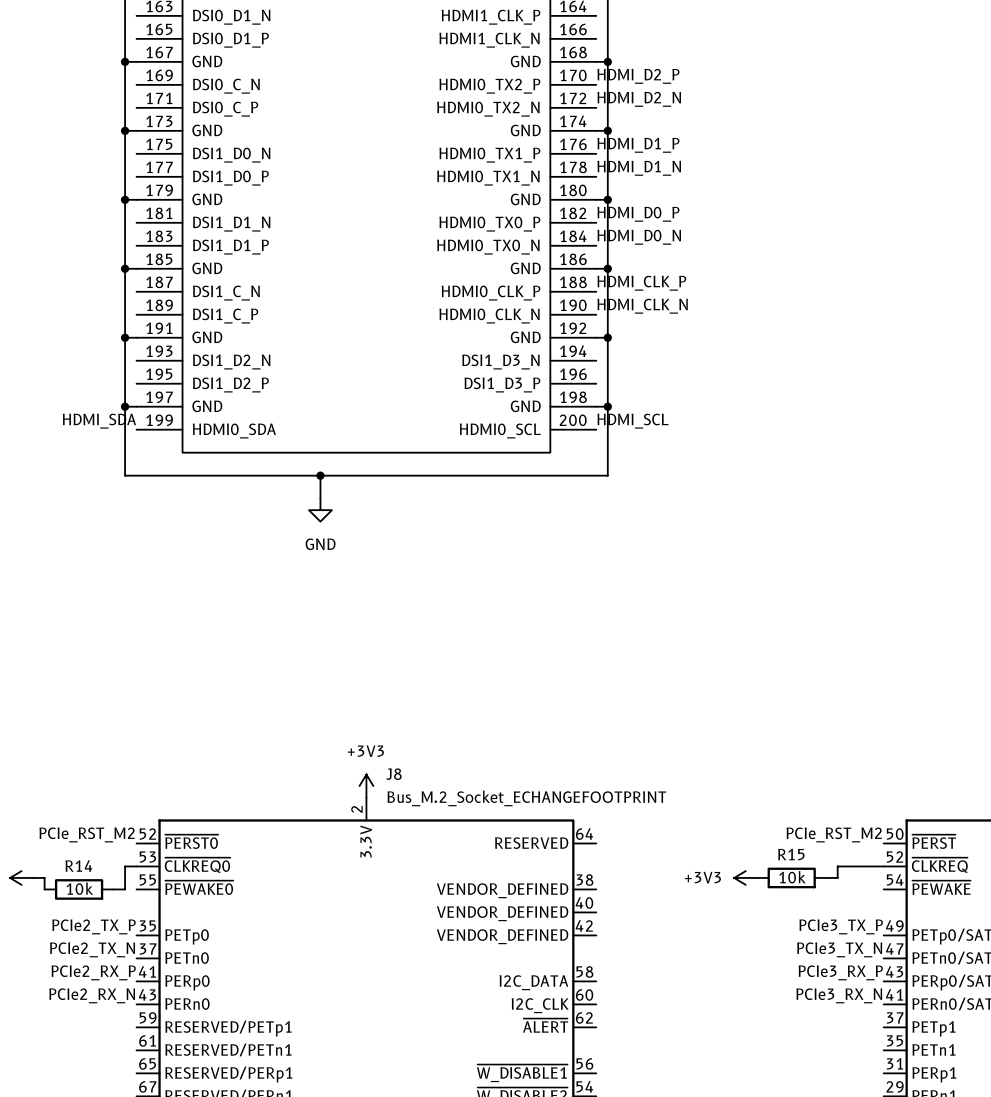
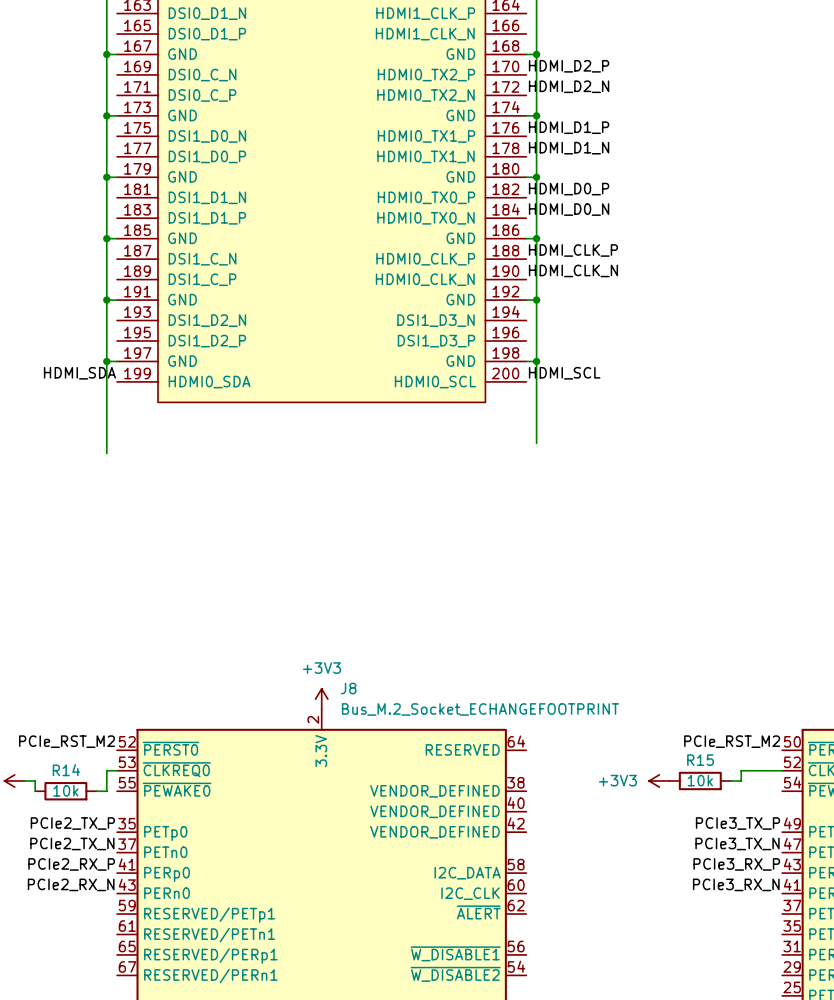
wire: (125, 475) (607, 475) -> (536, 443) (536, 422)
wire: none -> (106, 422) (106, 453)
wire: (320, 475) (320, 498) -> none
junction: (320, 475) -> none
power symbol: GND (320, 510) -> none

